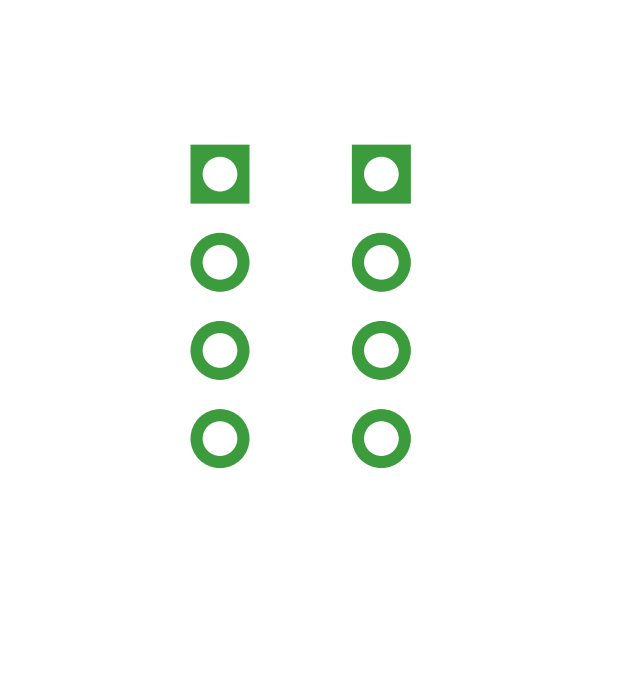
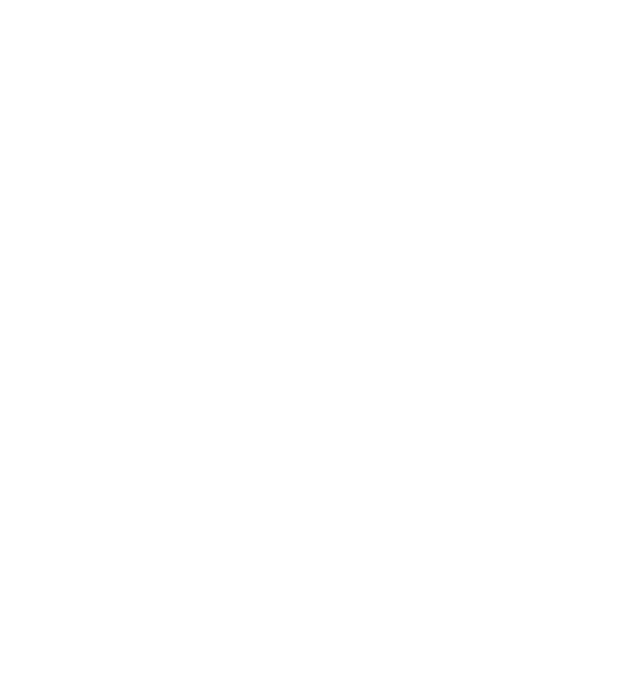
part: (219, 306) -> none
part: (381, 306) -> none

